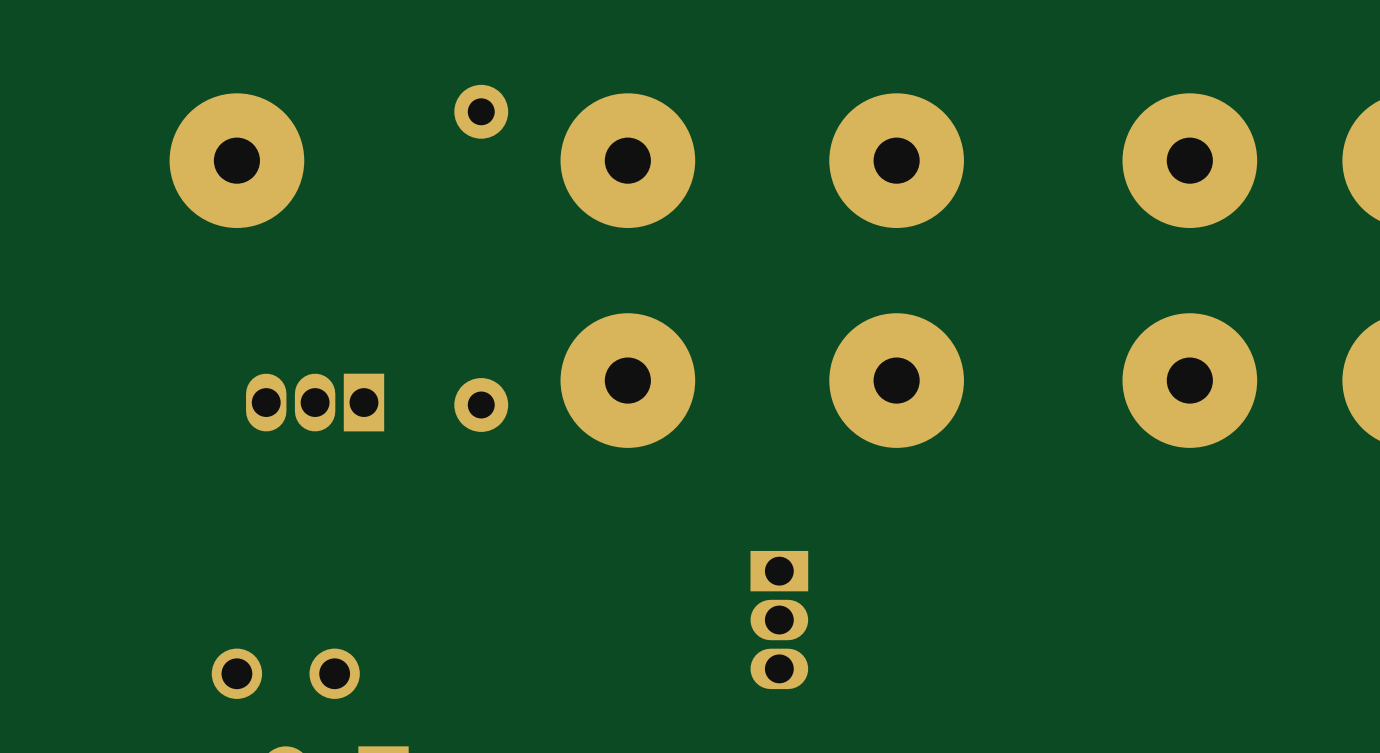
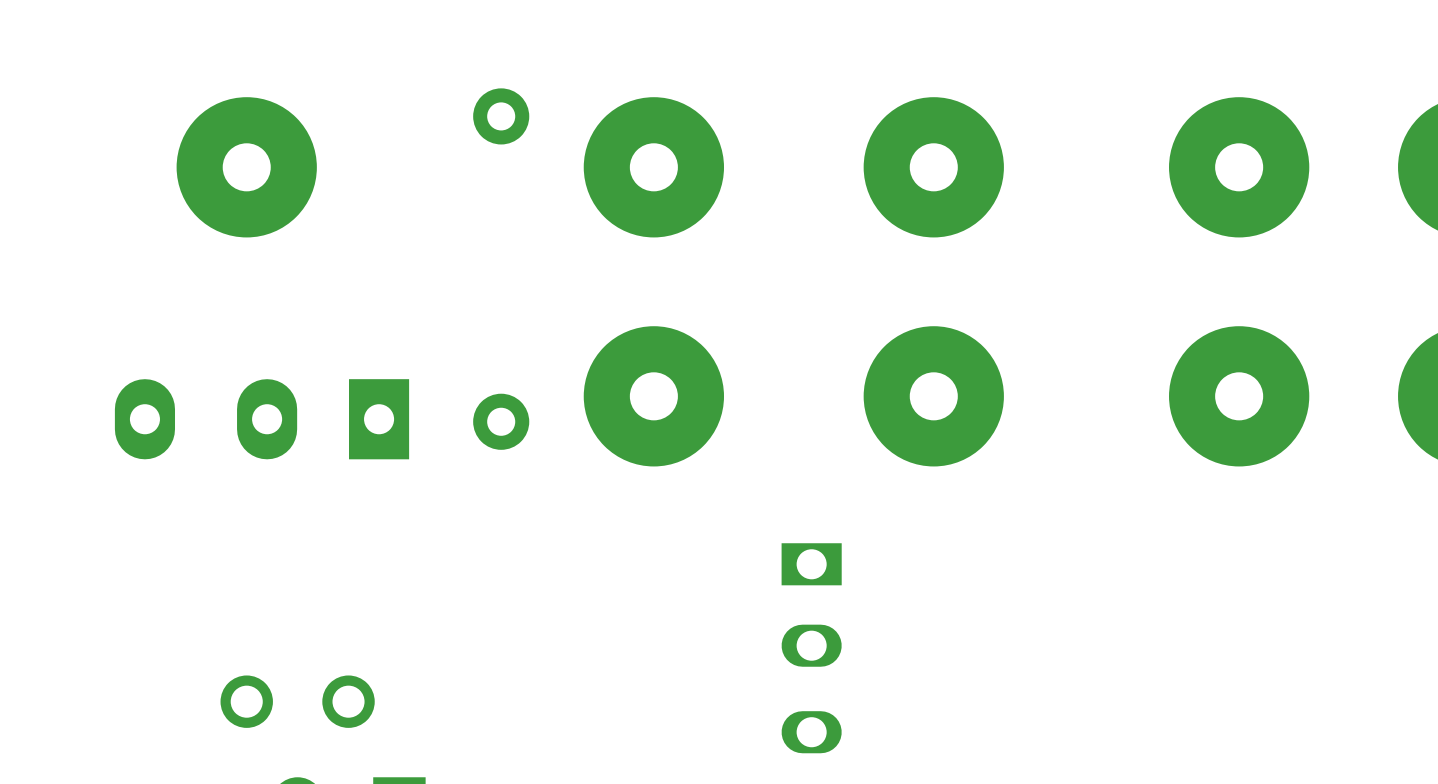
part: none -> (262, 419)
part: (315, 402) -> none
part footprint: [750, 550, 809, 690] -> [781, 543, 842, 754]

